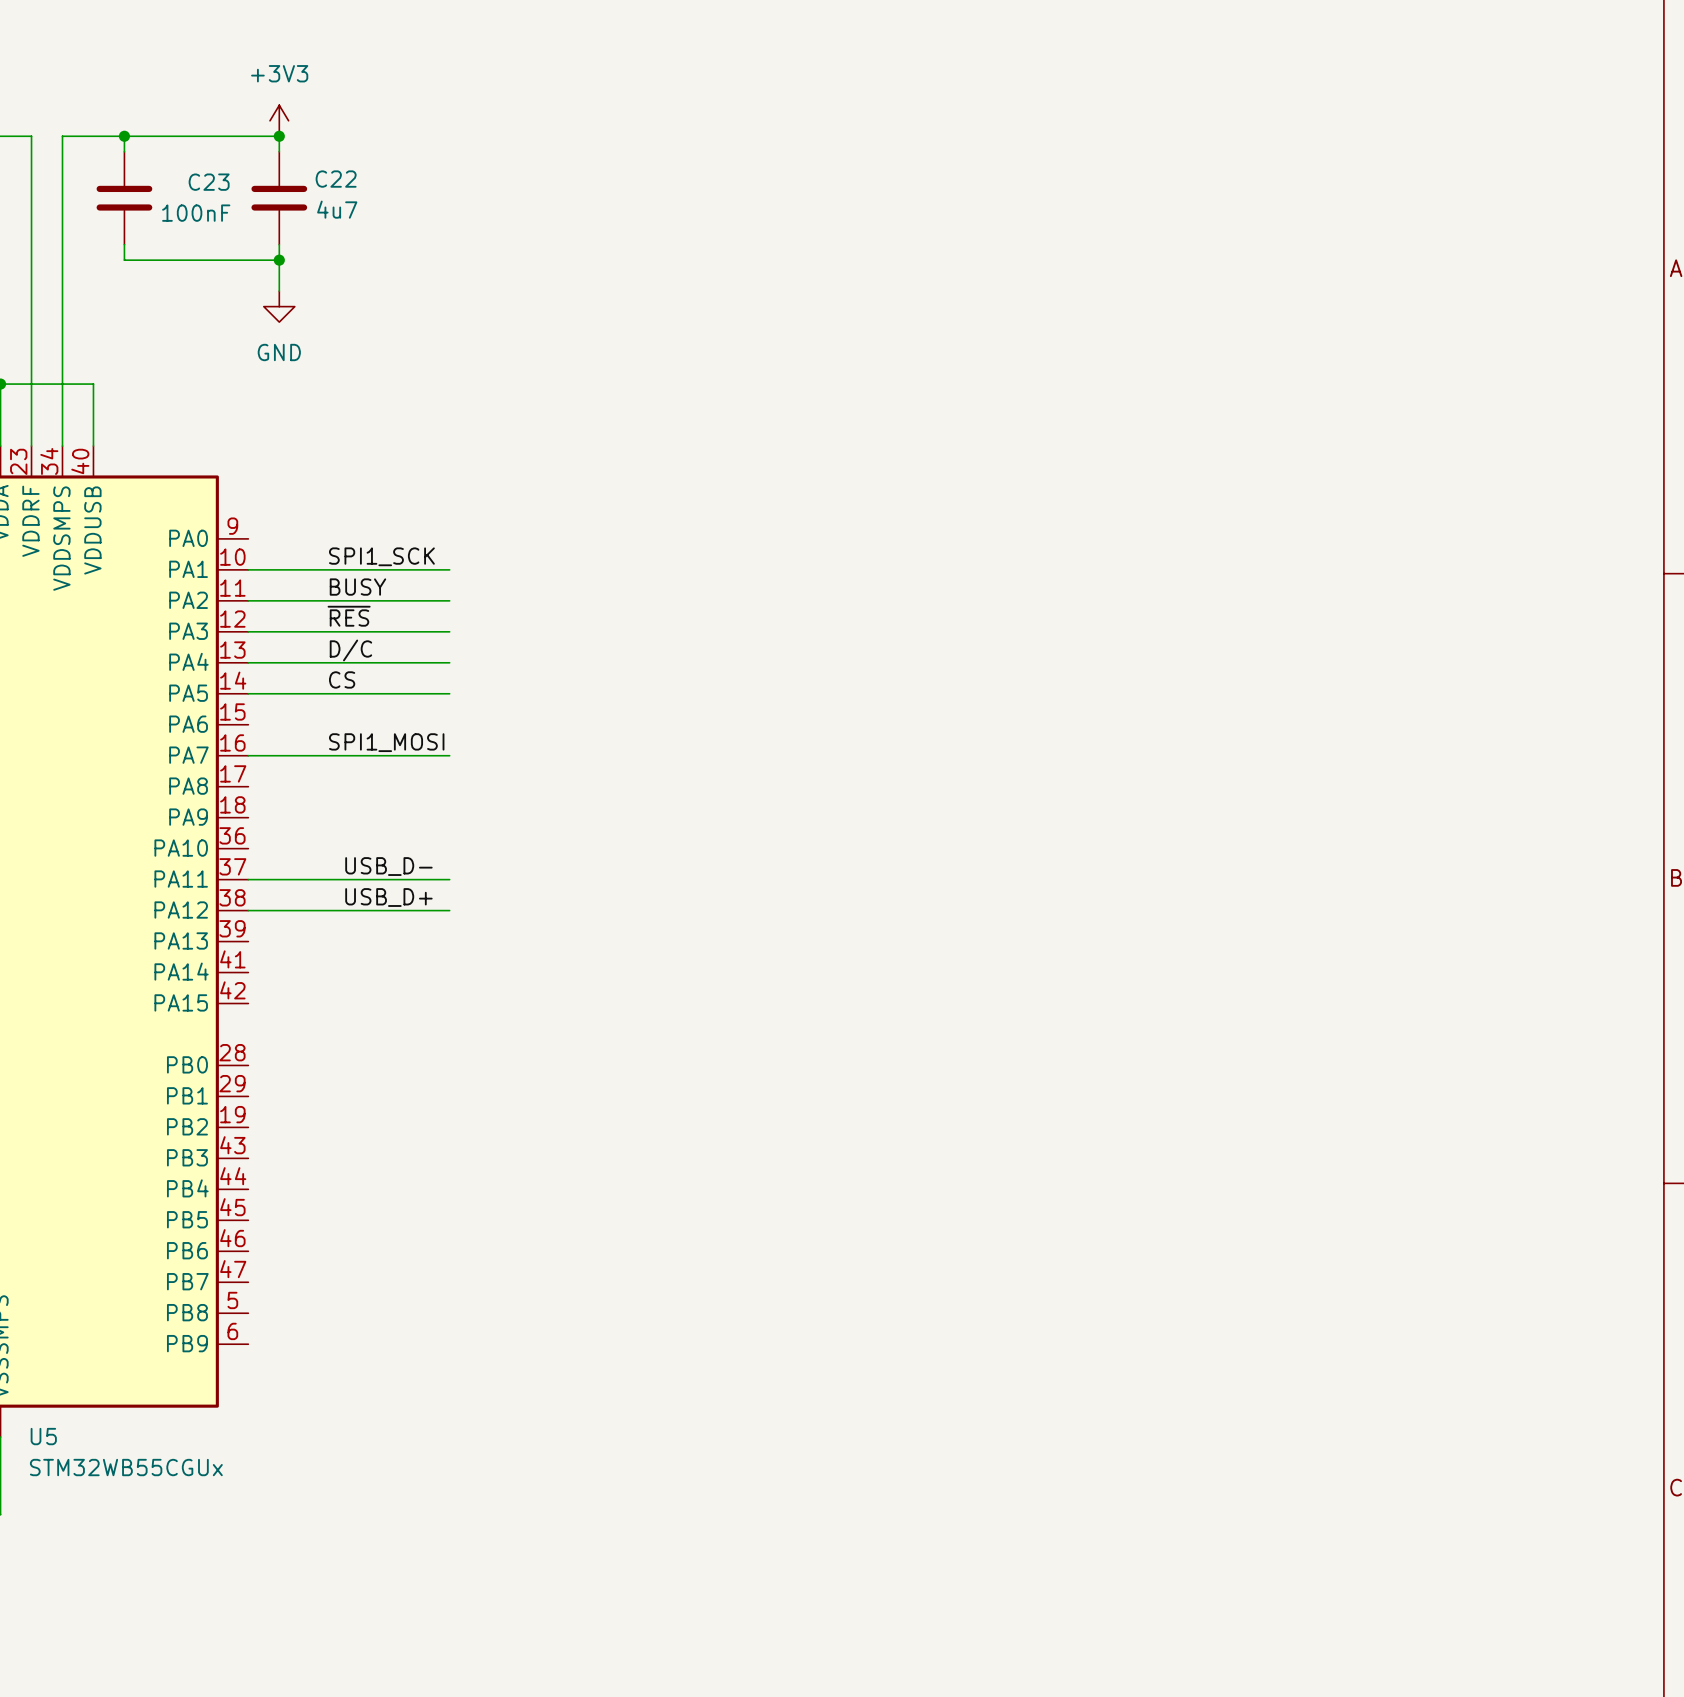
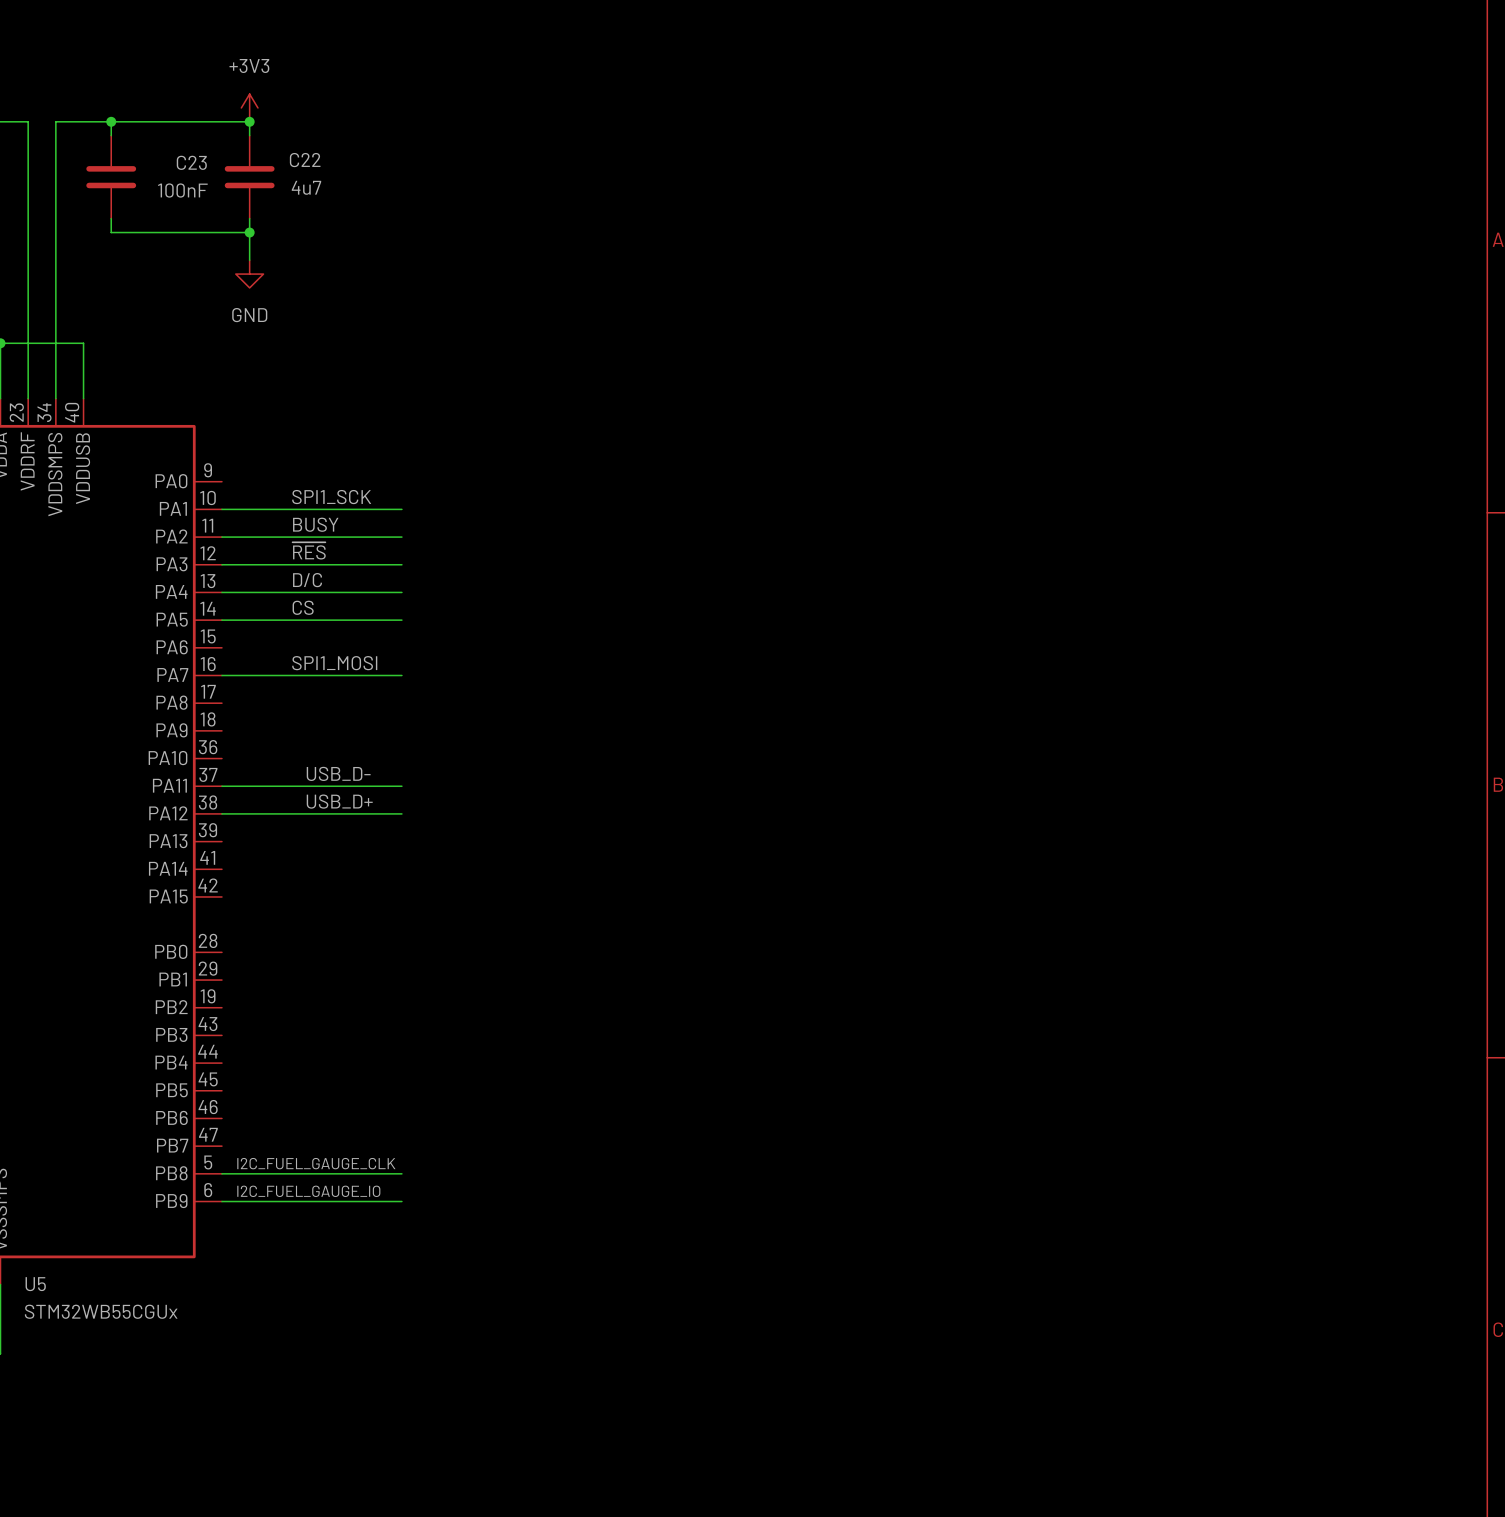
label: none -> I2C_FUEL_GAUGE_CLK (316, 1163)
wire: none -> (221, 1173) (401, 1173)
label: none -> I2C_FUEL_GAUGE_IO (308, 1191)
wire: none -> (221, 1201) (401, 1201)

